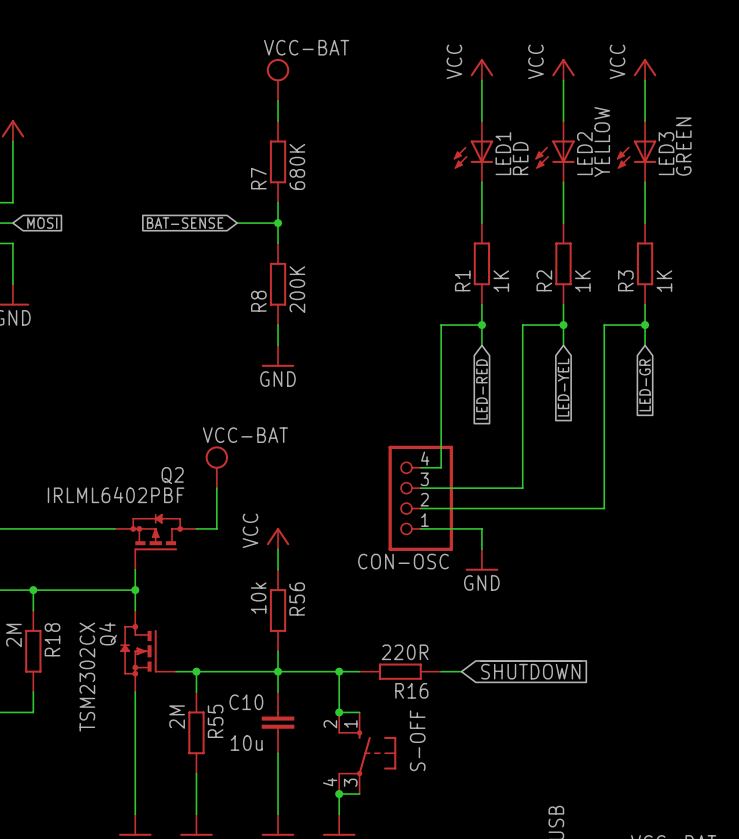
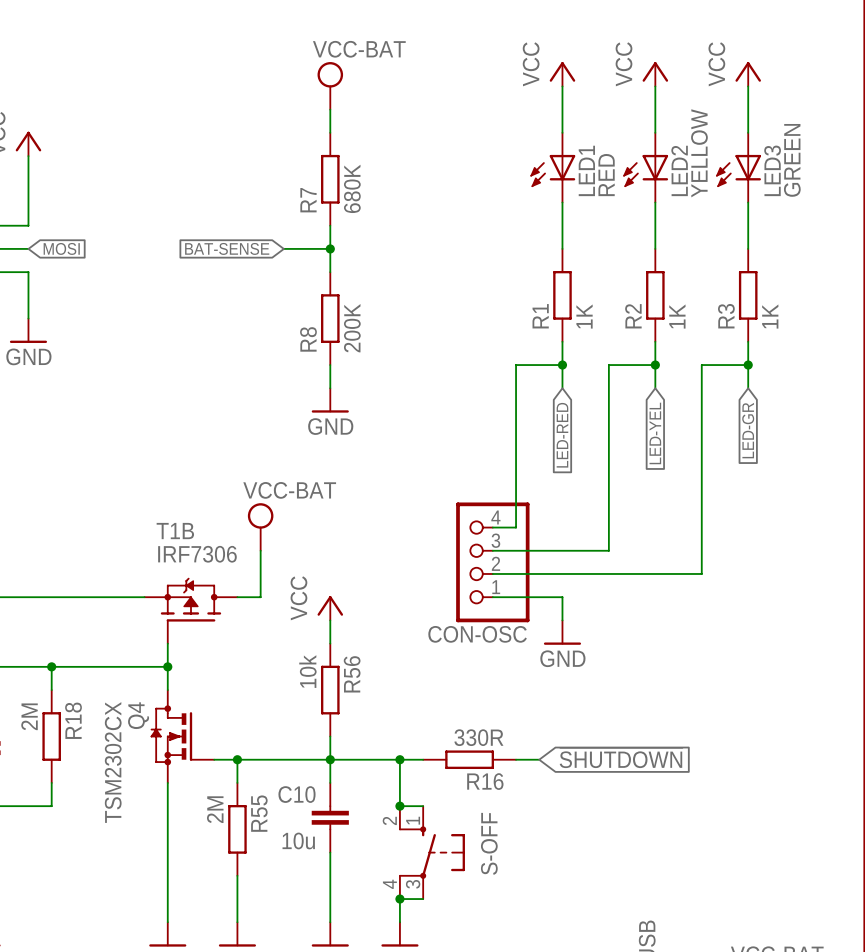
T1B: none -> IRF7306 (190, 610)
Q2: IRLML6402PBF (155, 541) -> none
R16 value: 220R (405, 652) -> 330R (478, 737)

